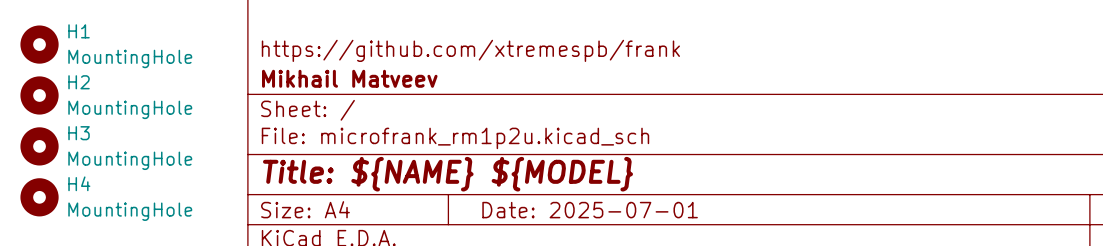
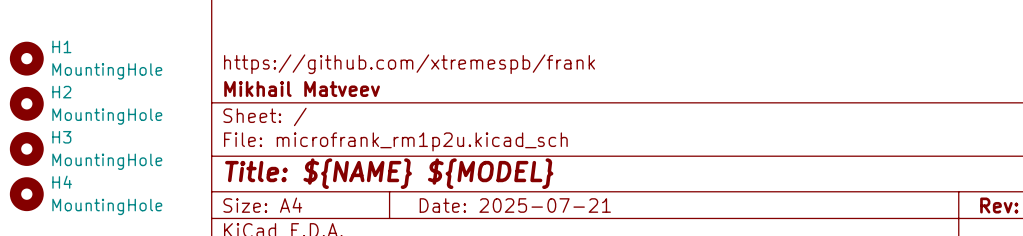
title block: Date: 2025-07-01 (590, 210) -> Date: 2025-07-21 (515, 205)

